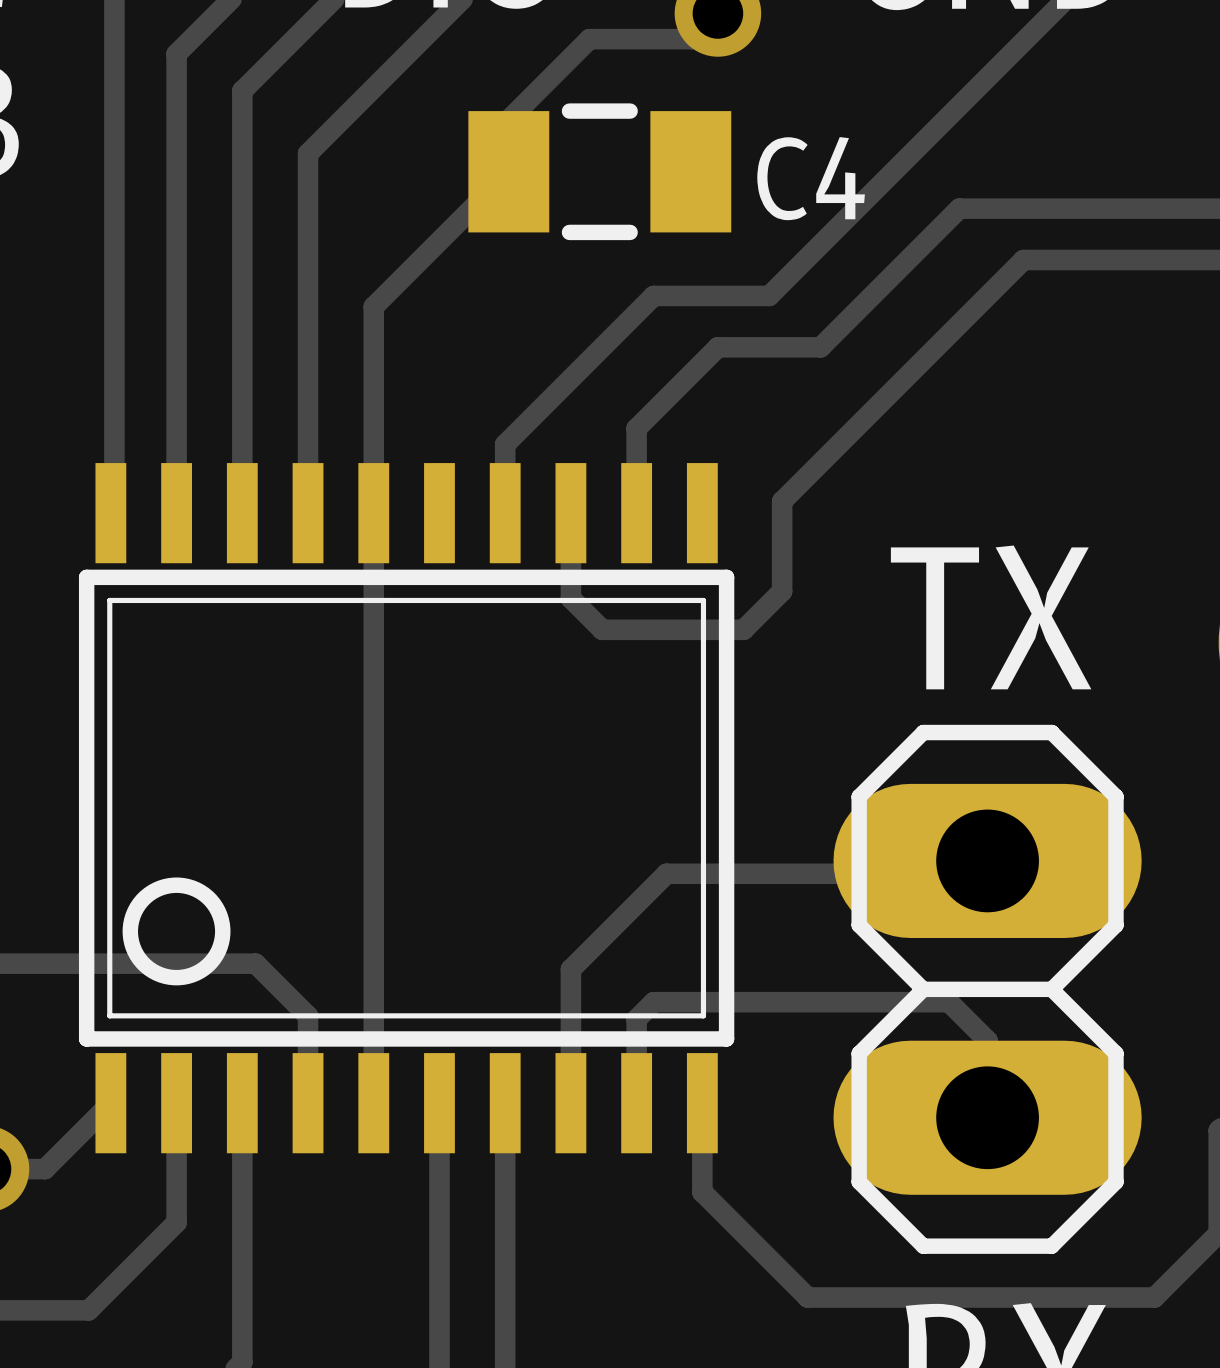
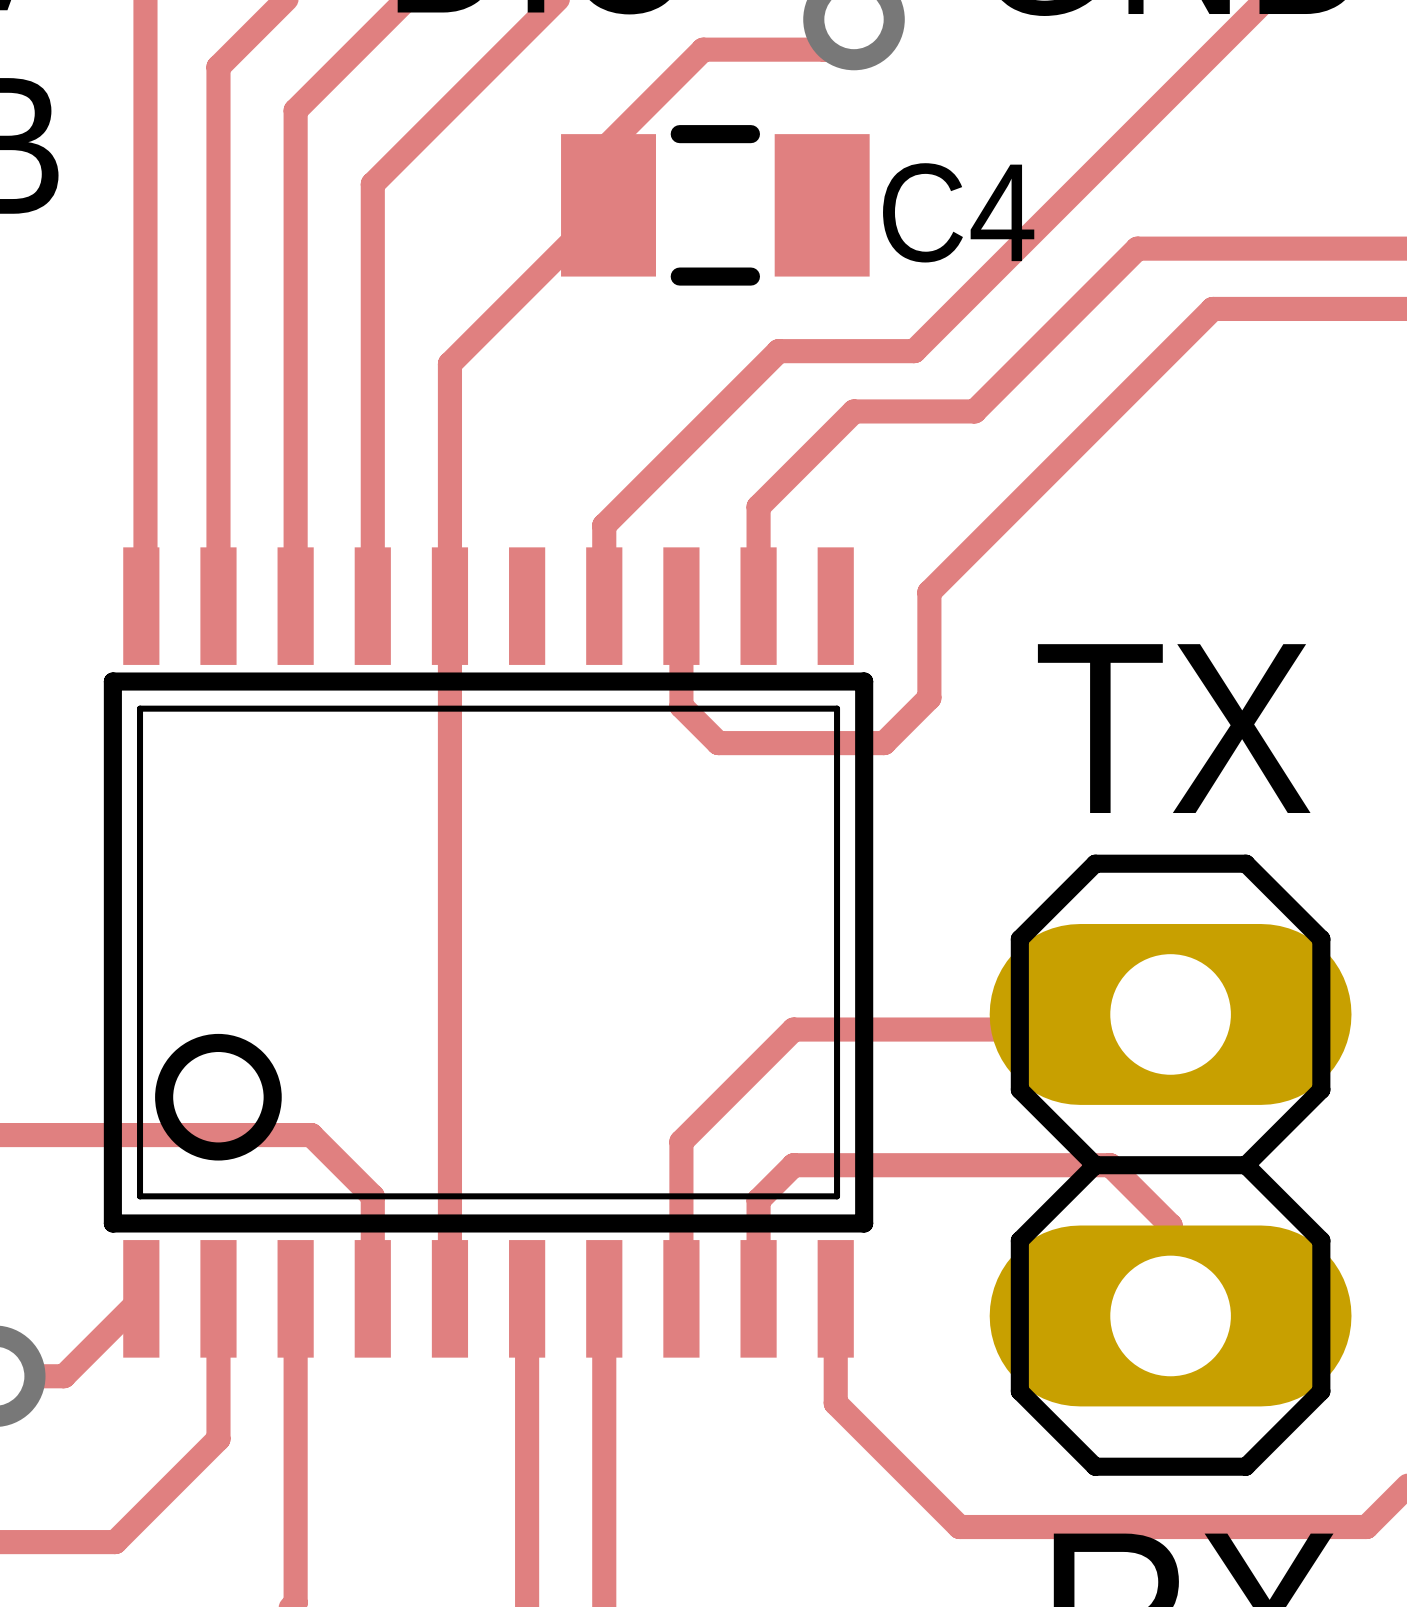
track: (653, 1002) (949, 1002) -> (778, 1180) (793, 1165) (1110, 1165) (1125, 1180)

